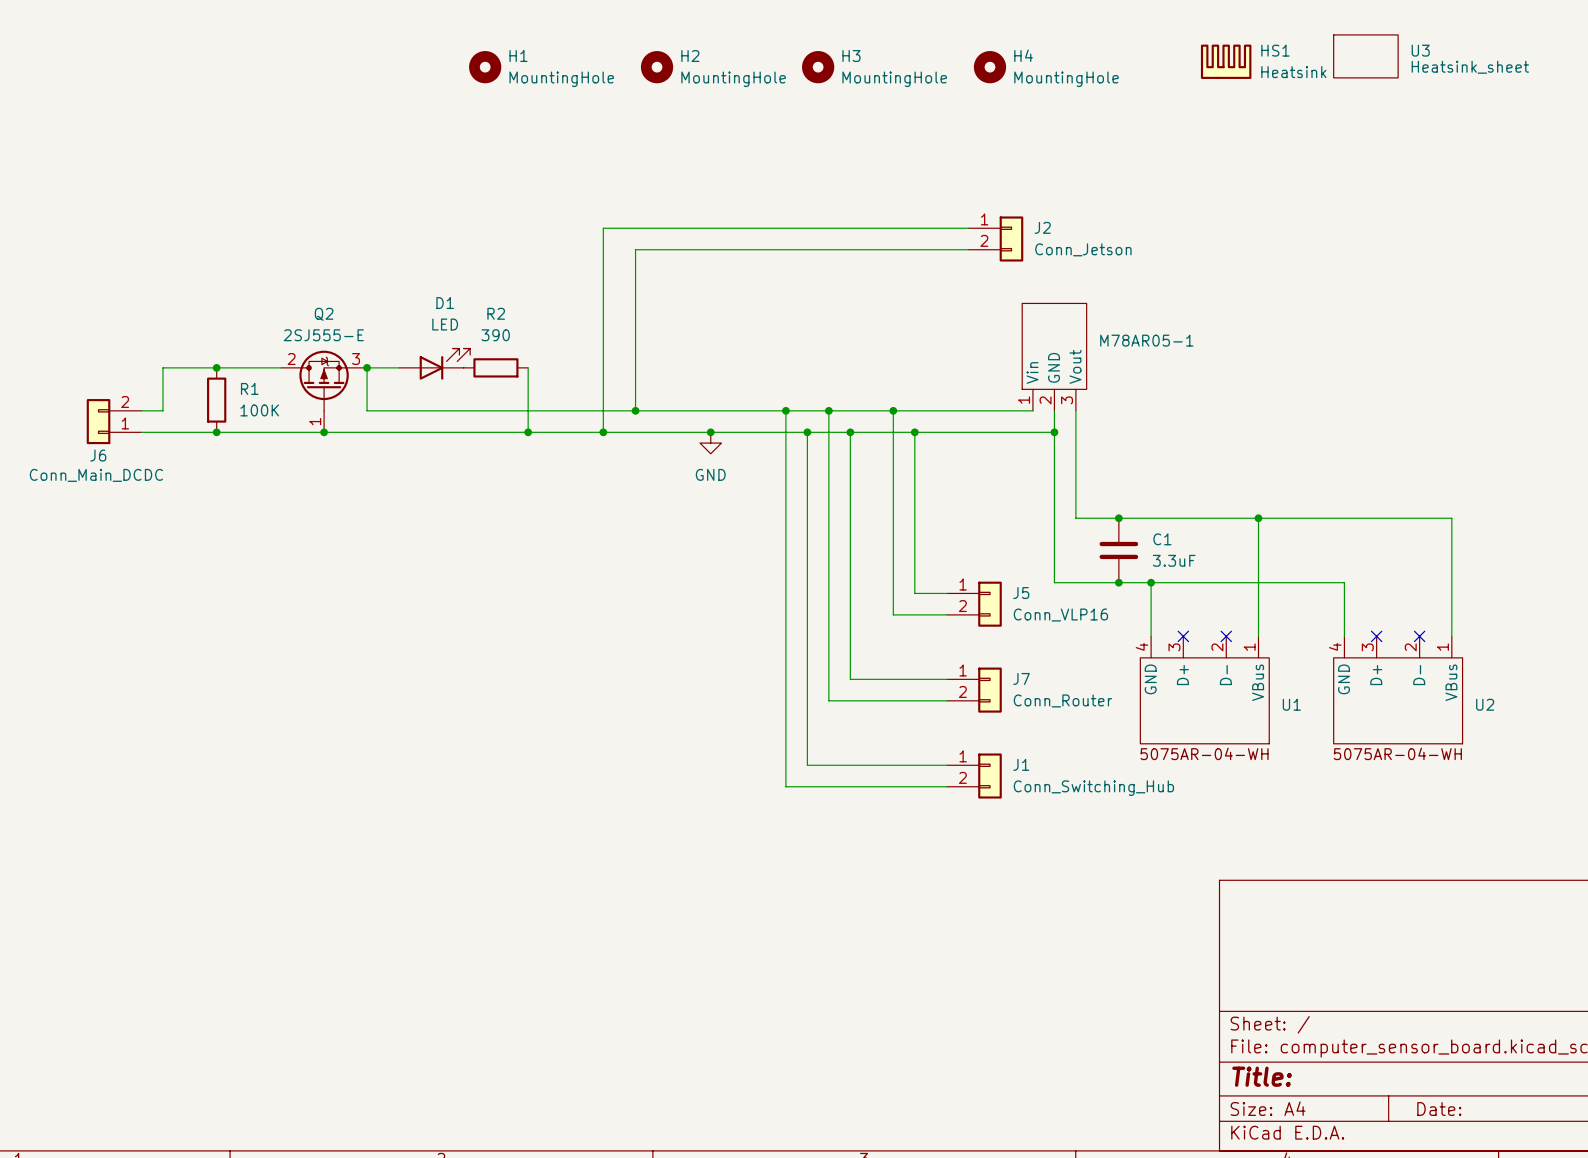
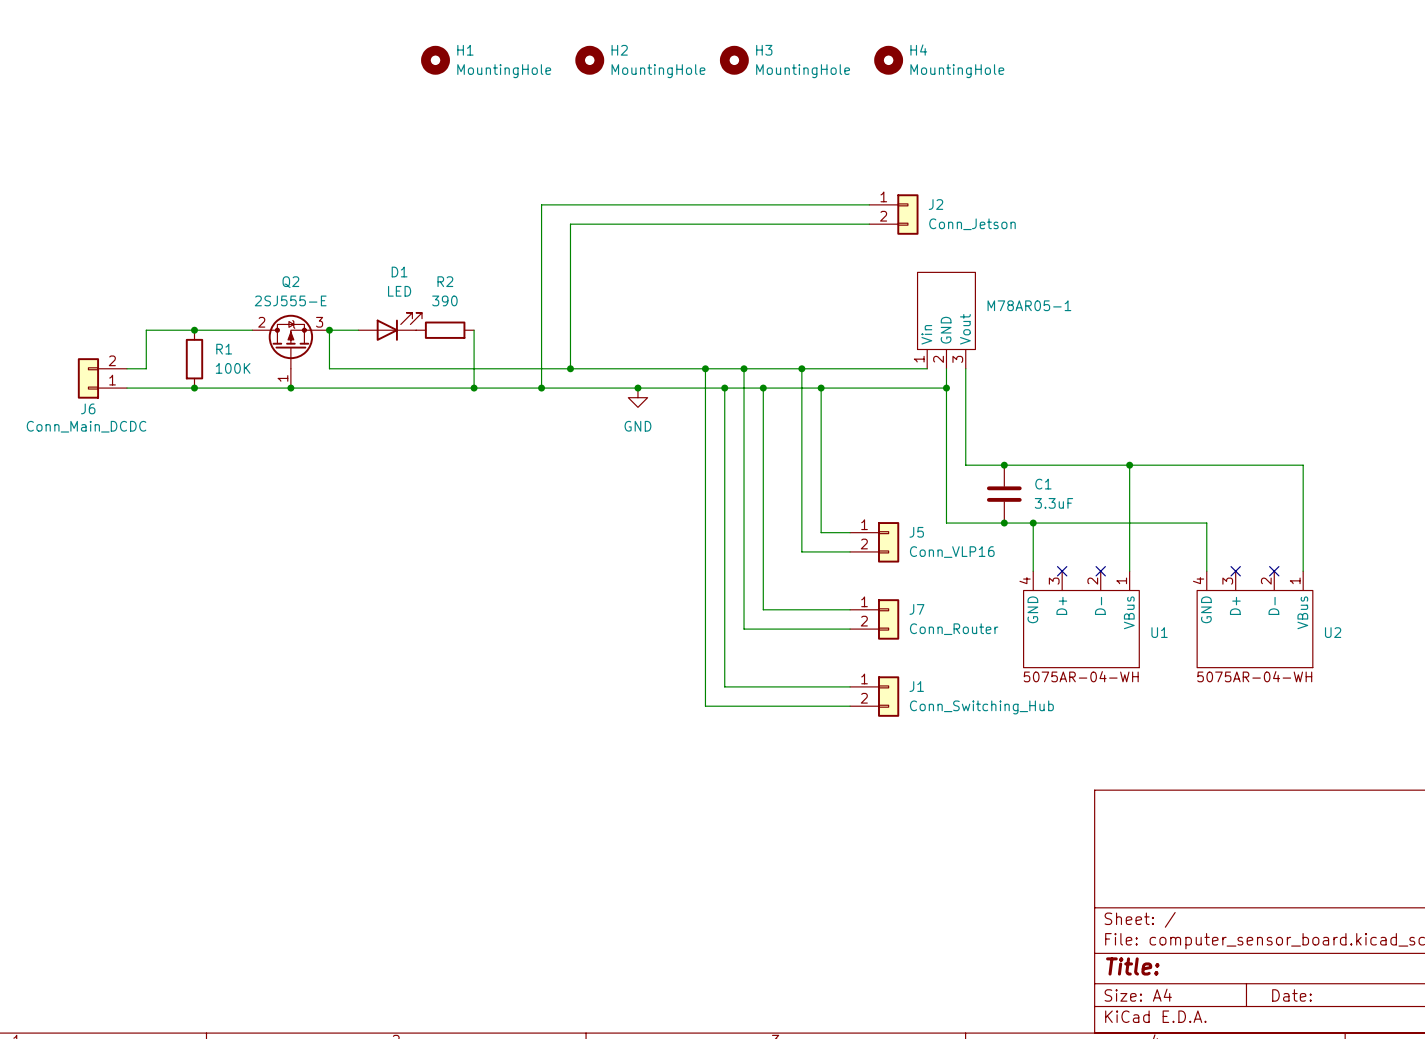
U3: Heatsink_sheet (1365, 56) -> none
HS1: Heatsink (1226, 61) -> none

